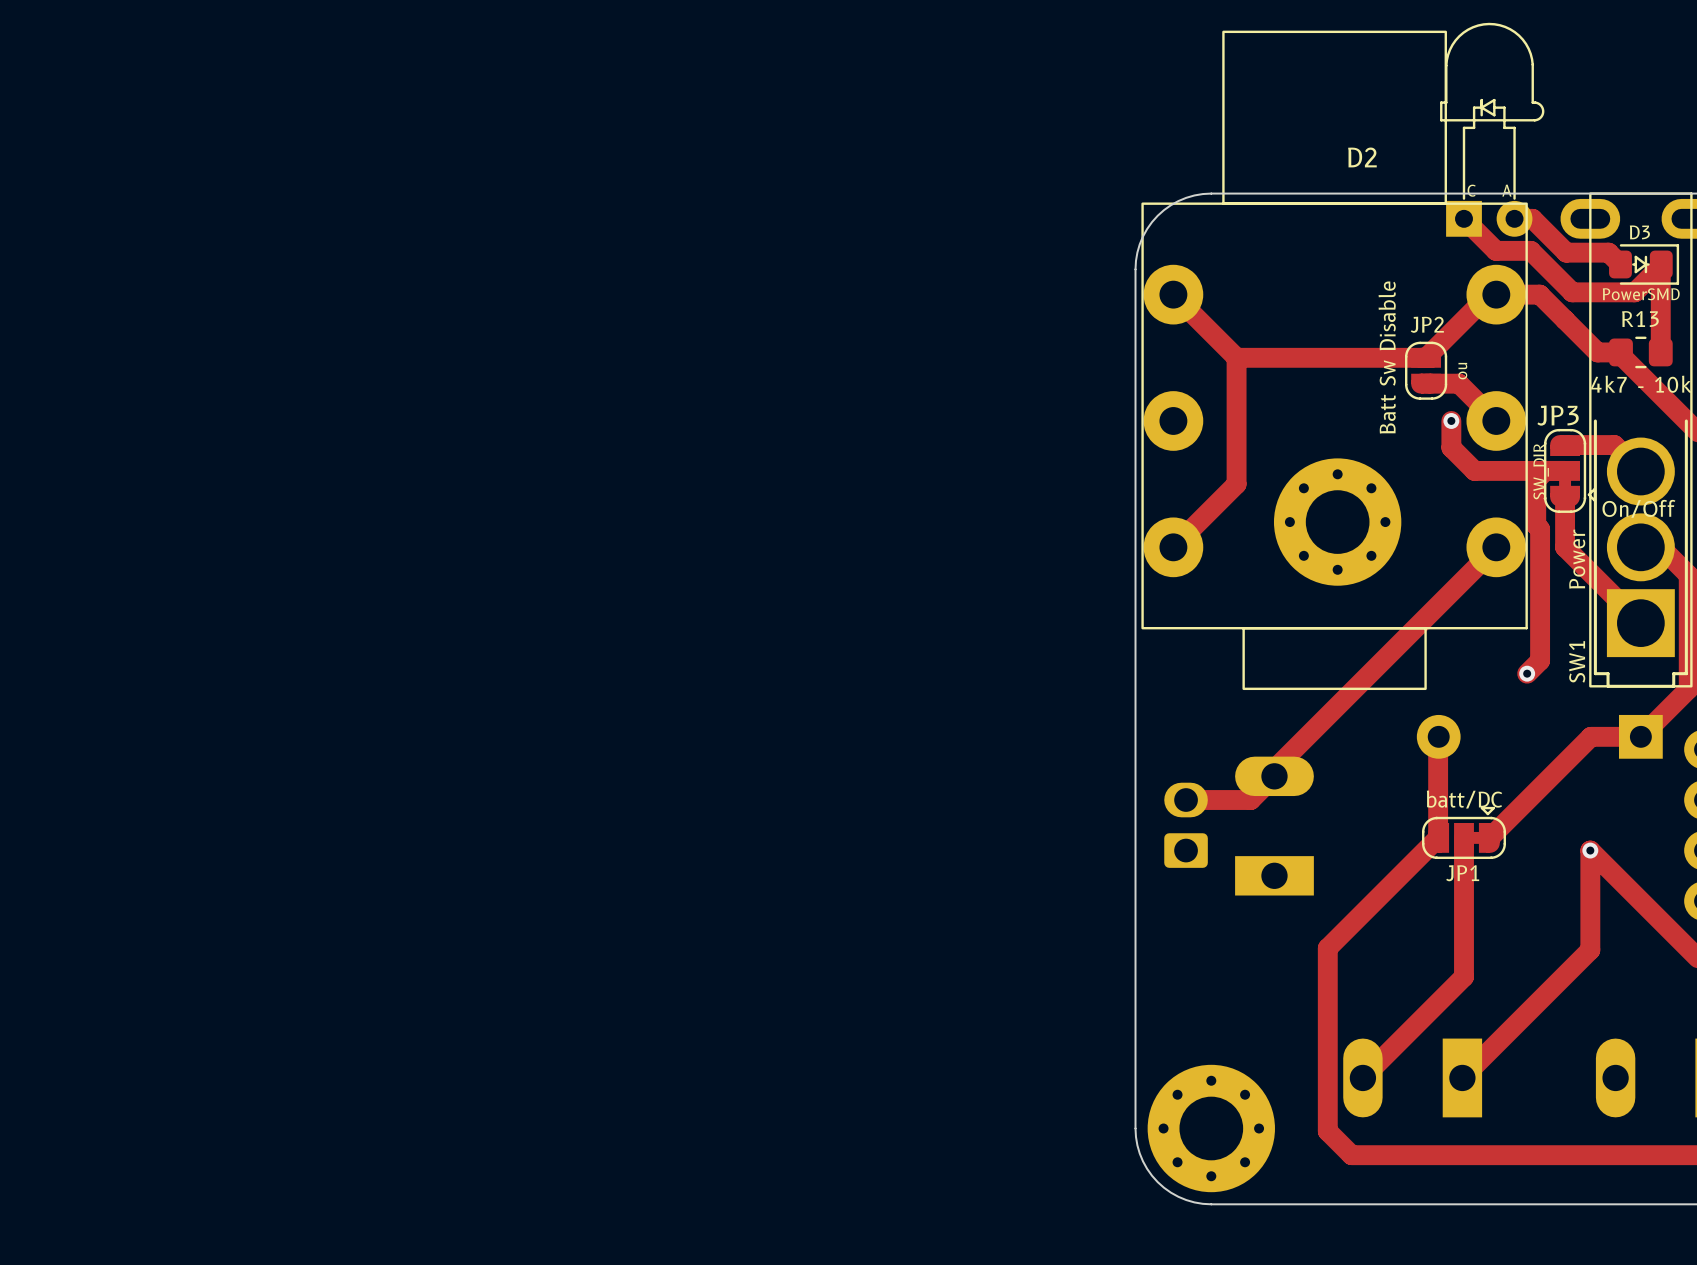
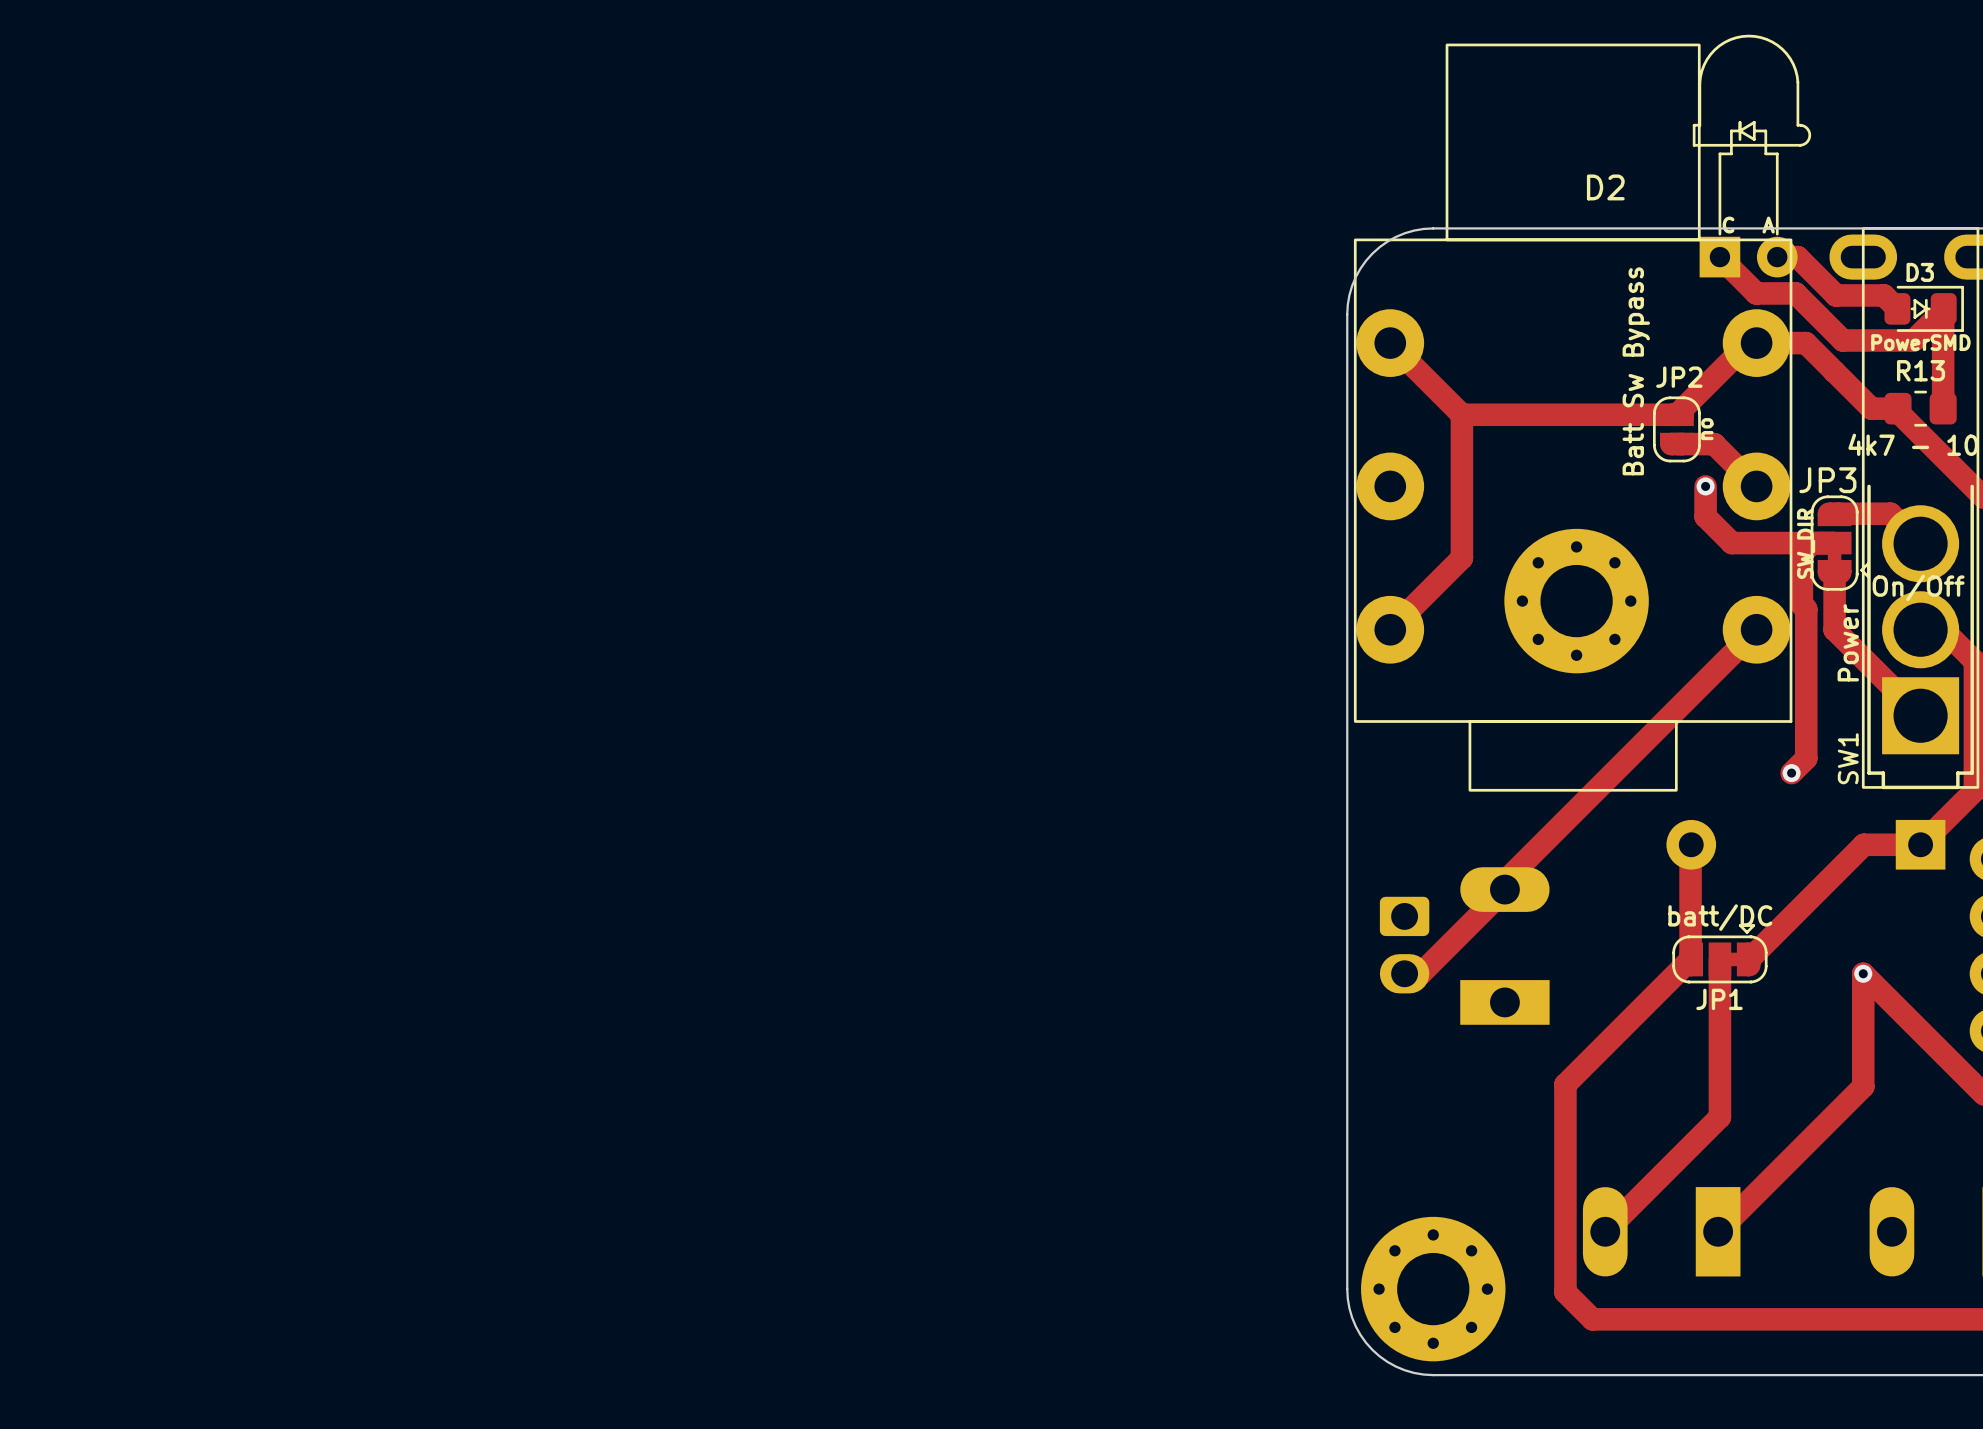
JP2 value: Batt Sw Disable (1387, 357) -> Batt Sw Bypass (1636, 371)
JP2 text rotation: 0° (1462, 371) -> 180° (1707, 429)
track: (1186, 800) (1250, 800) -> (1404, 973) (1420, 973) (1478, 916)
part rotation: 0° (1186, 825) -> 180° (1404, 945)

